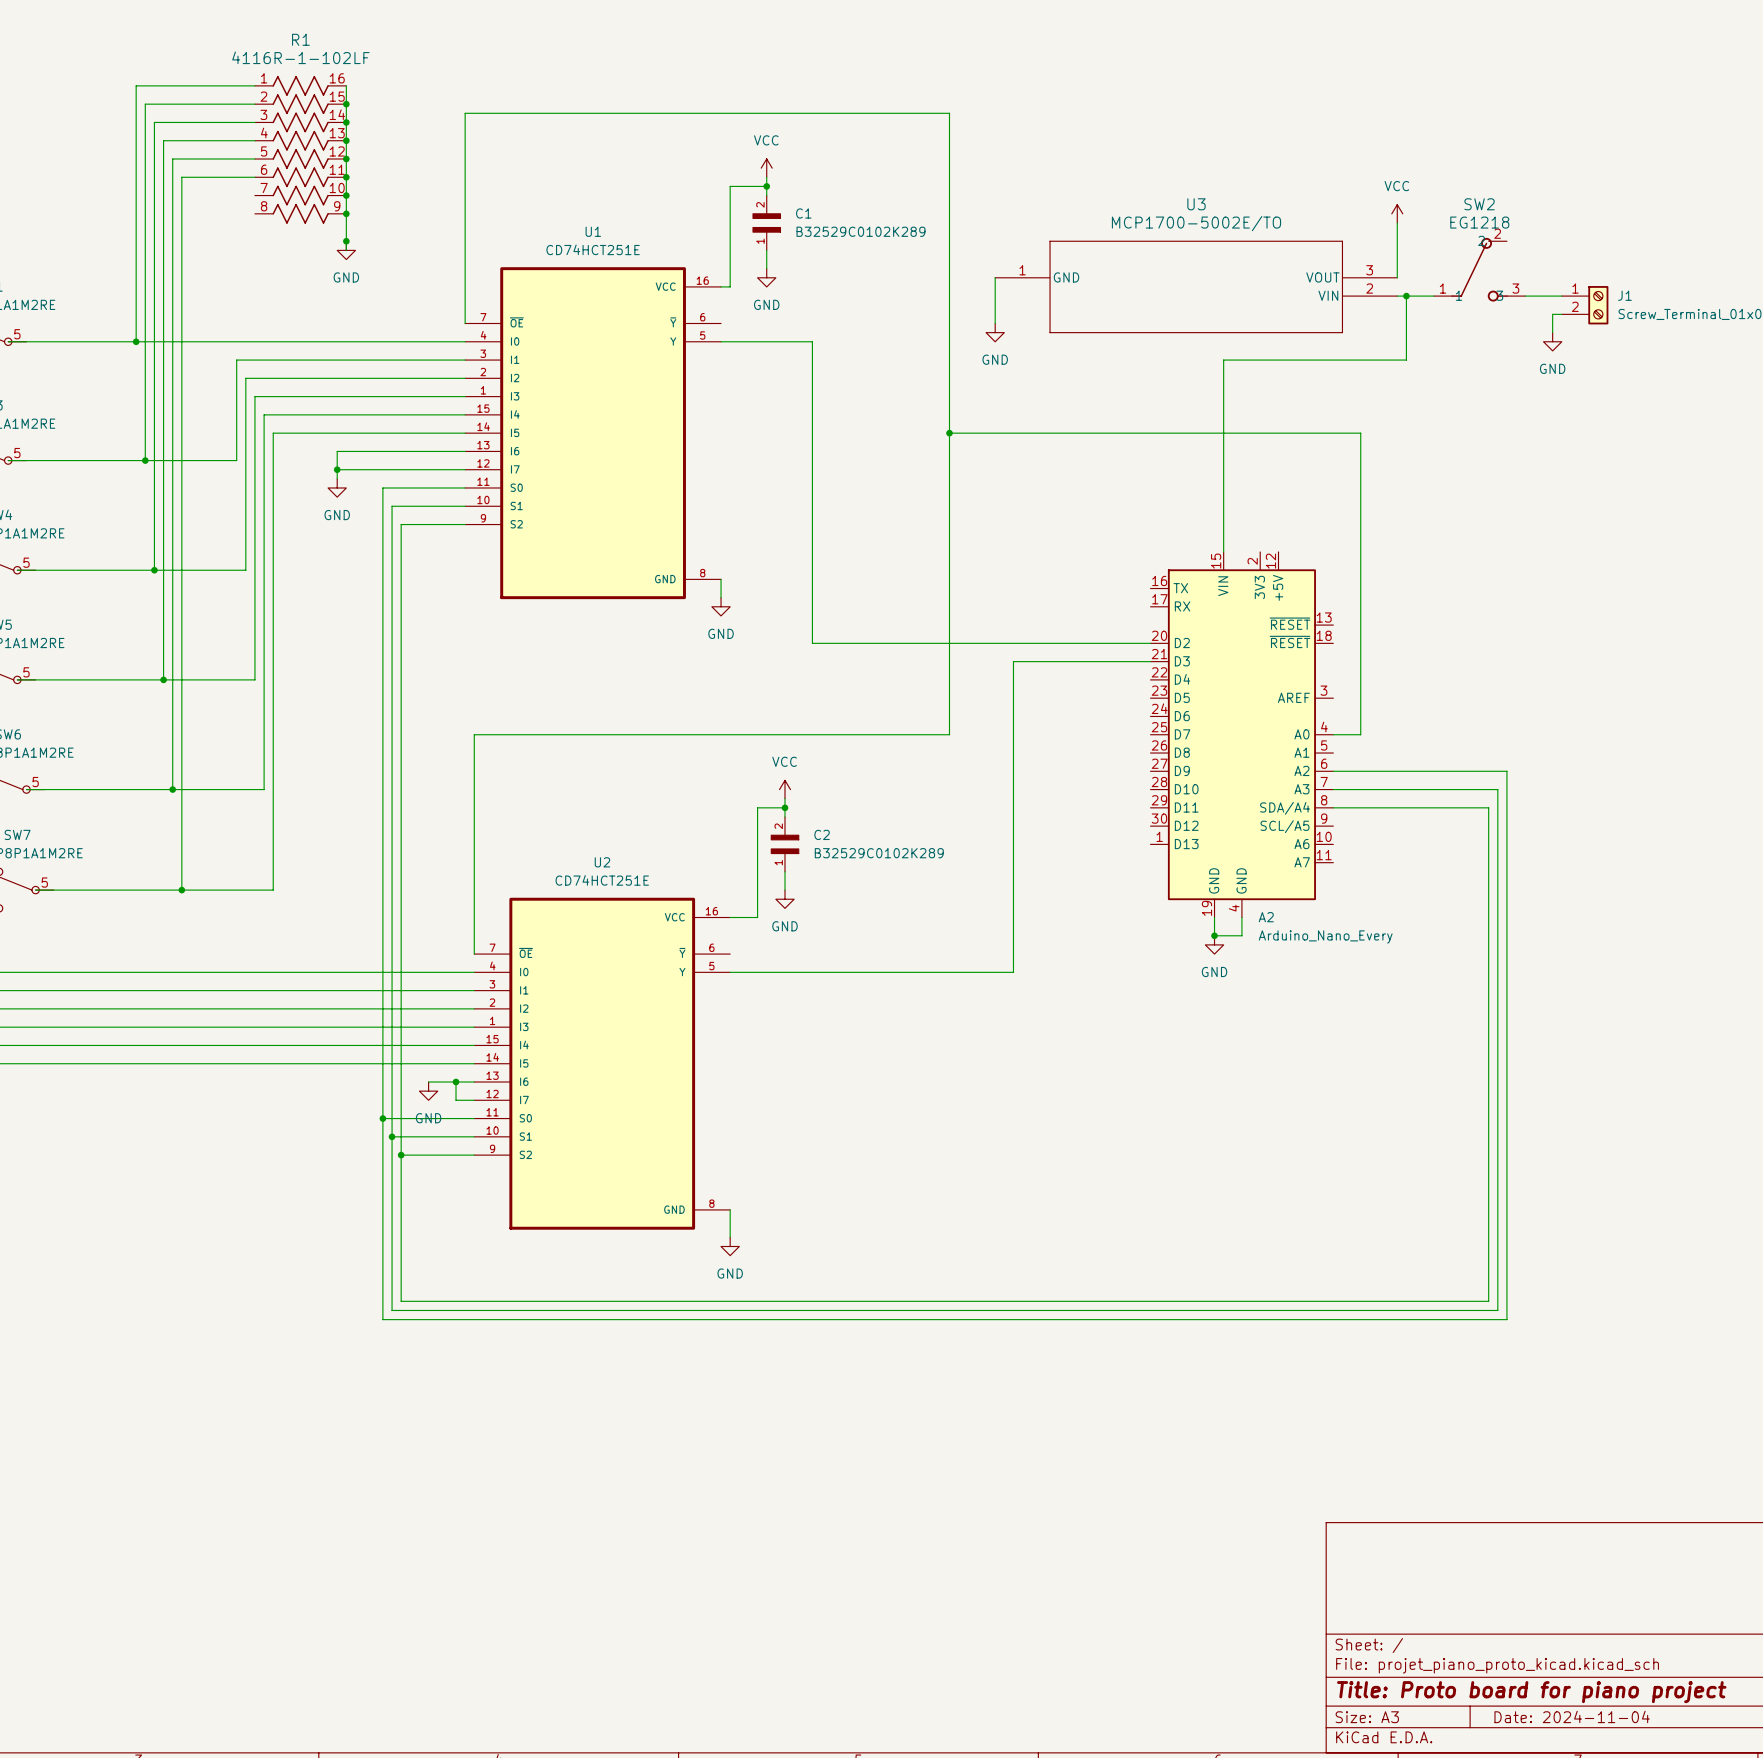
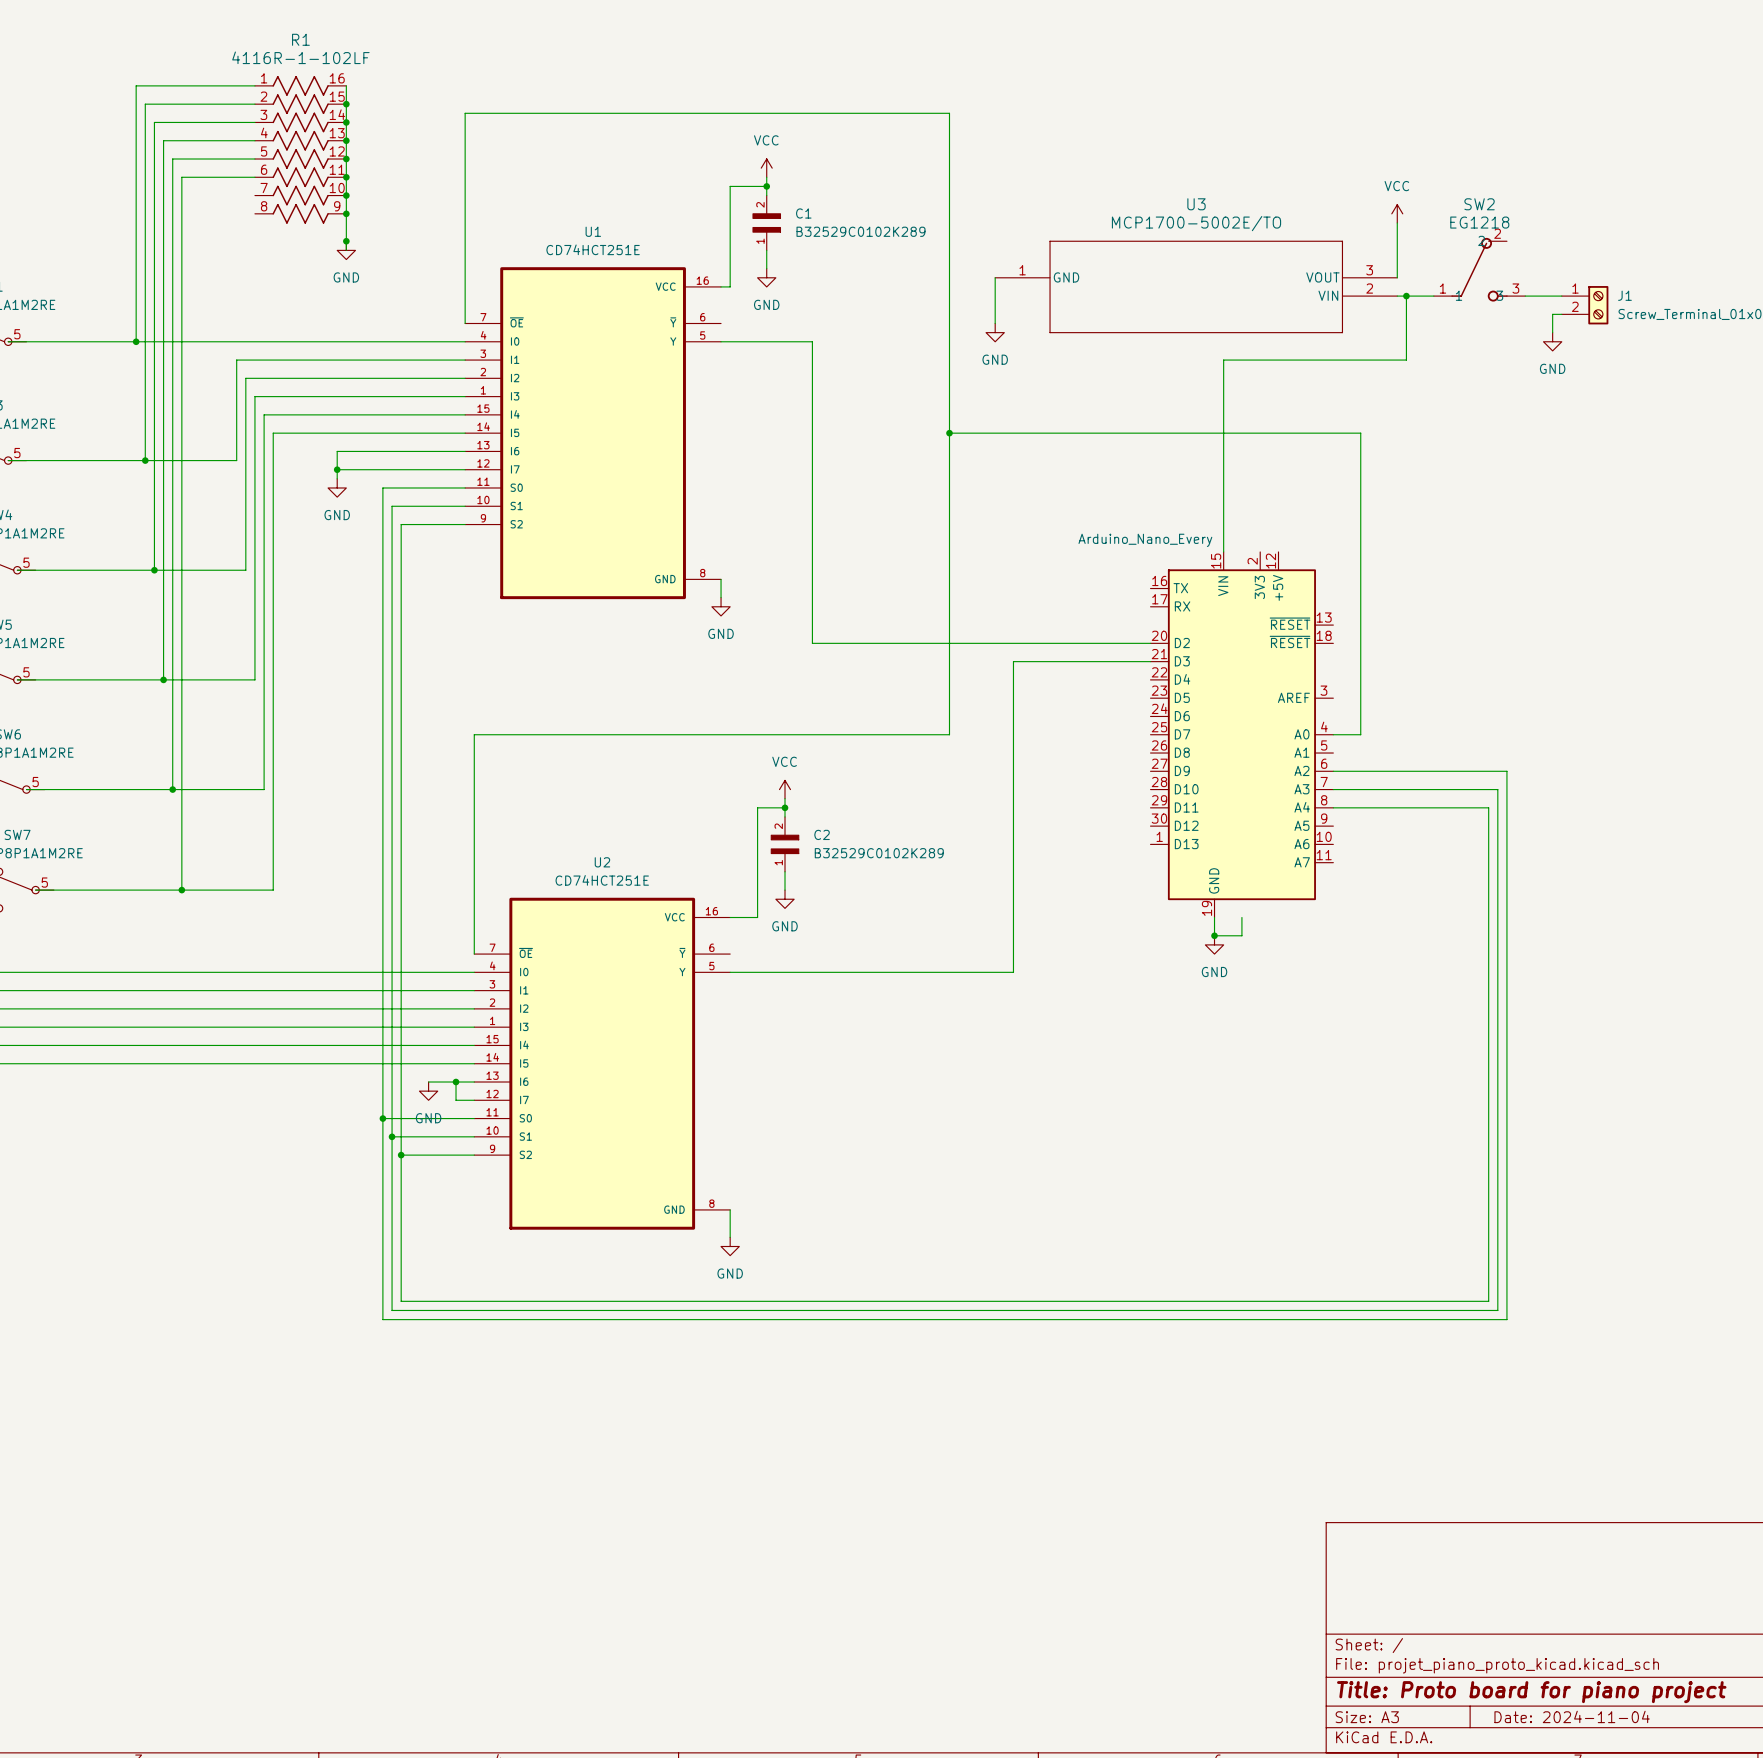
A2: Arduino_Nano_Every (1241, 734) -> none
part: none -> Arduino_Nano_Every (1241, 734)

